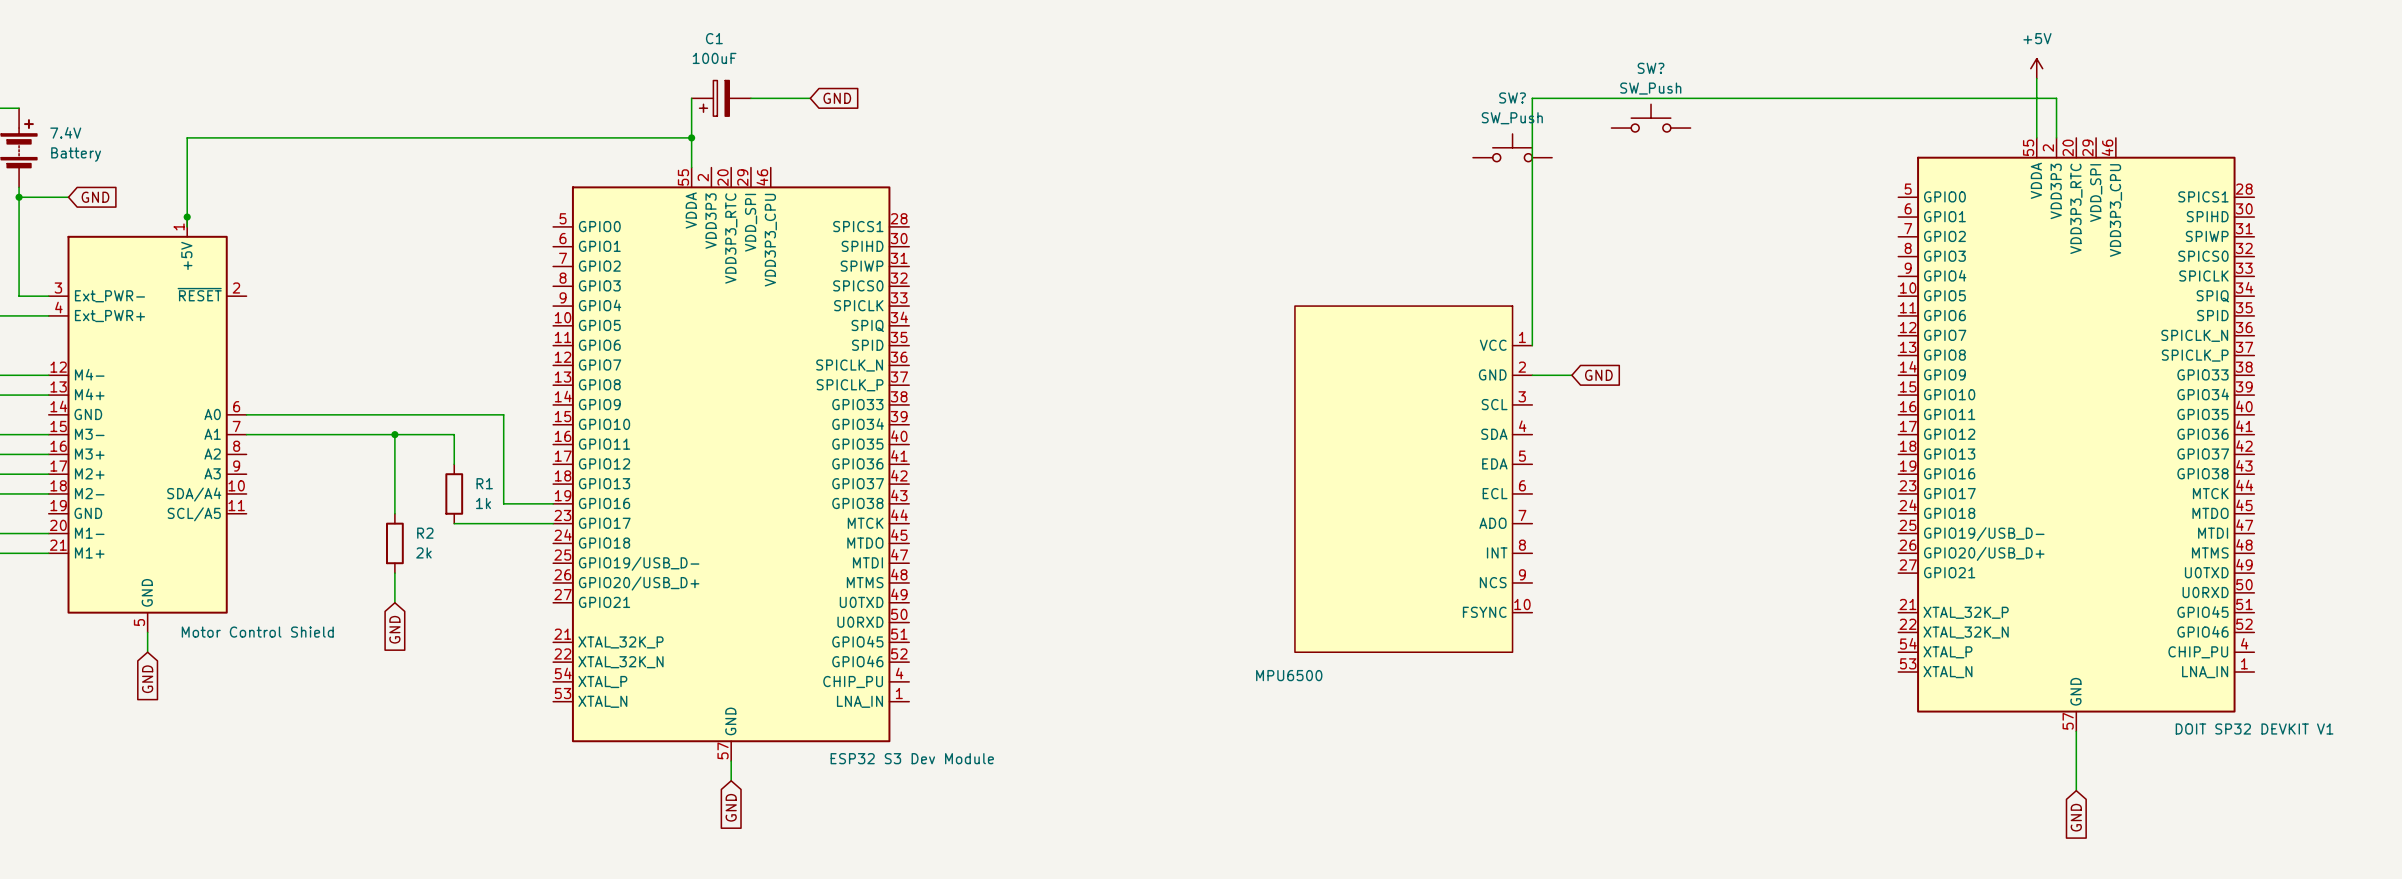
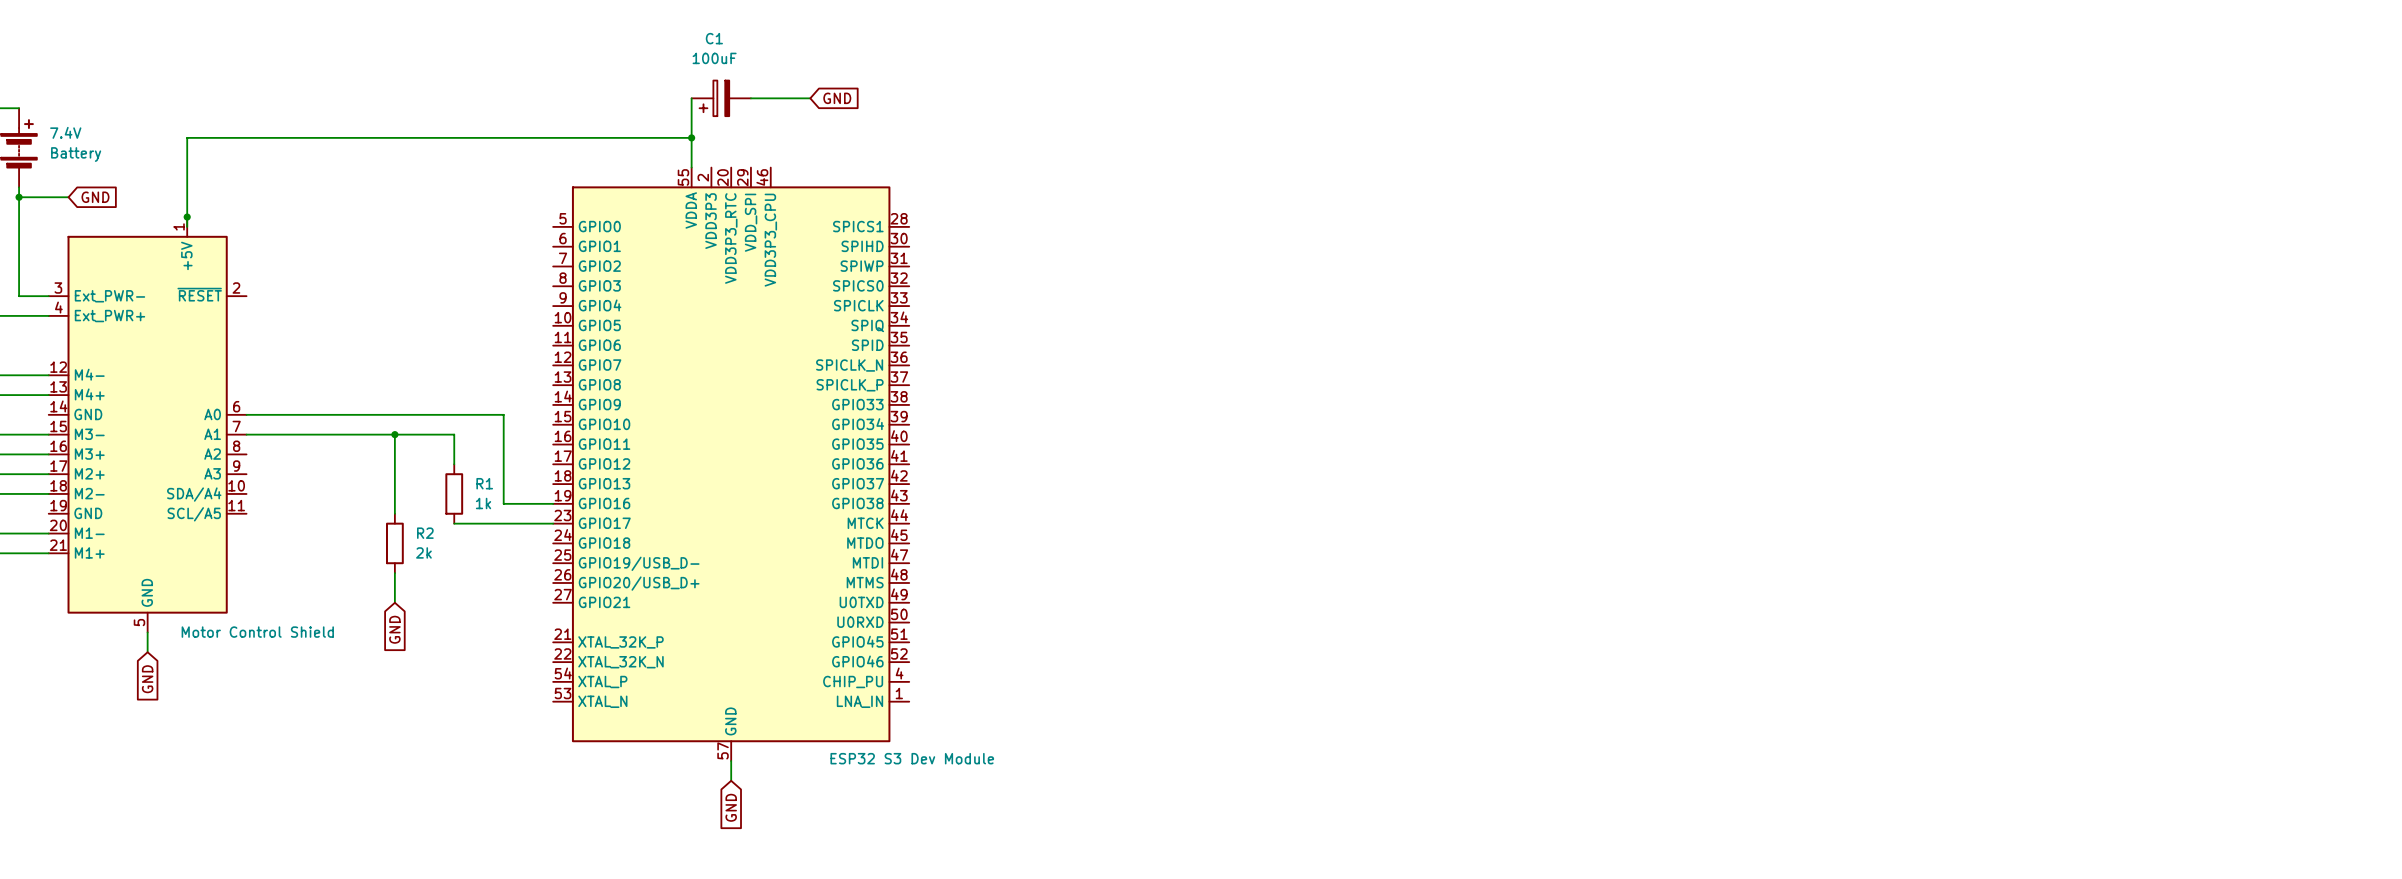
power symbol: +5V (2036, 68) -> none
wire: (2036, 78) (2036, 137) -> none
SW?: SW_Push (1651, 118) -> none
wire: (2056, 137) (2056, 98) (1532, 98) (1532, 345) -> none
SW?: SW_Push (1512, 147) -> none
wire: (1532, 375) (1571, 375) -> none
global label: GND (1598, 375) -> none
part: DOIT SP32 DEVKIT V1 (2076, 434) -> none
MPU6500: (1413, 479) -> none
wire: (2076, 731) (2076, 790) -> none
global label: GND (2076, 817) -> none

